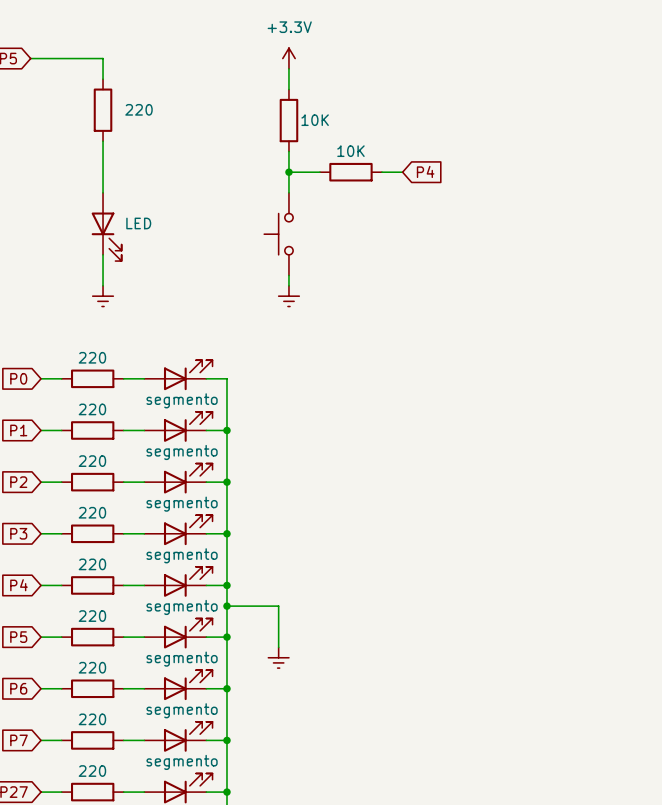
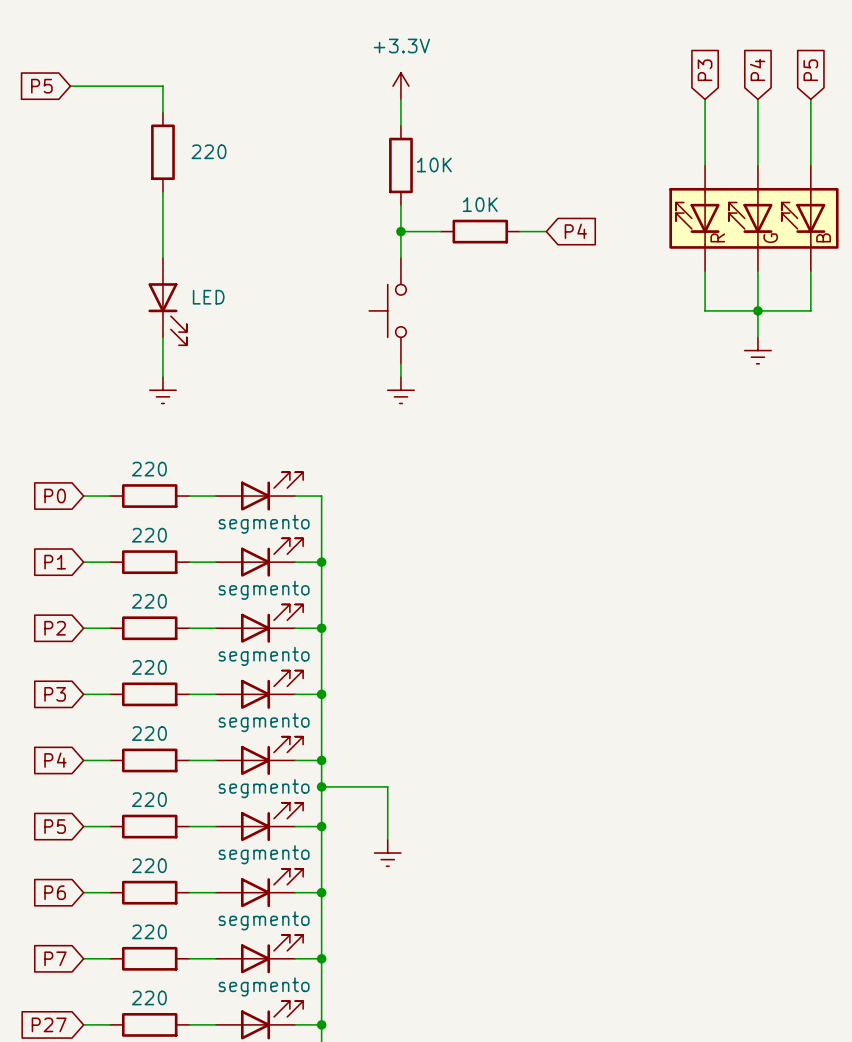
global label: none -> P4 (757, 69)
global label: none -> P3 (705, 70)
global label: none -> P5 (810, 70)
wire: none -> (705, 99) (705, 165)
wire: none -> (757, 99) (757, 165)
wire: none -> (810, 99) (810, 165)
part: none -> (753, 218)
wire: none -> (705, 271) (705, 310) (810, 310) (810, 271)
wire: none -> (757, 271) (757, 337)
junction: none -> (757, 310)
power symbol: none -> (757, 350)

